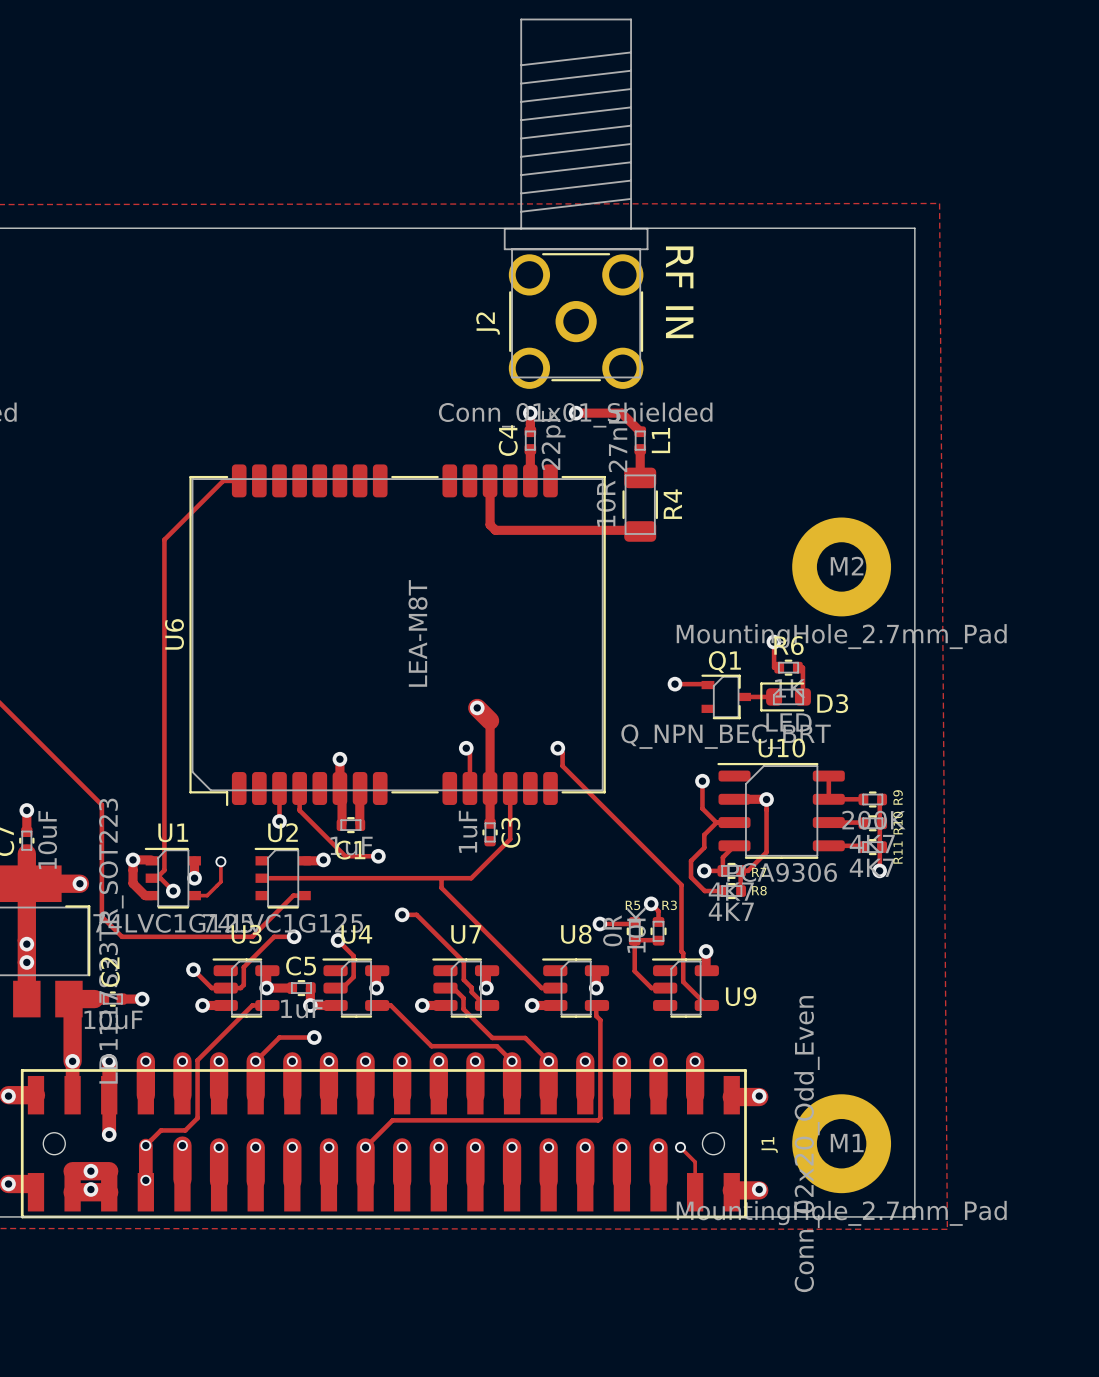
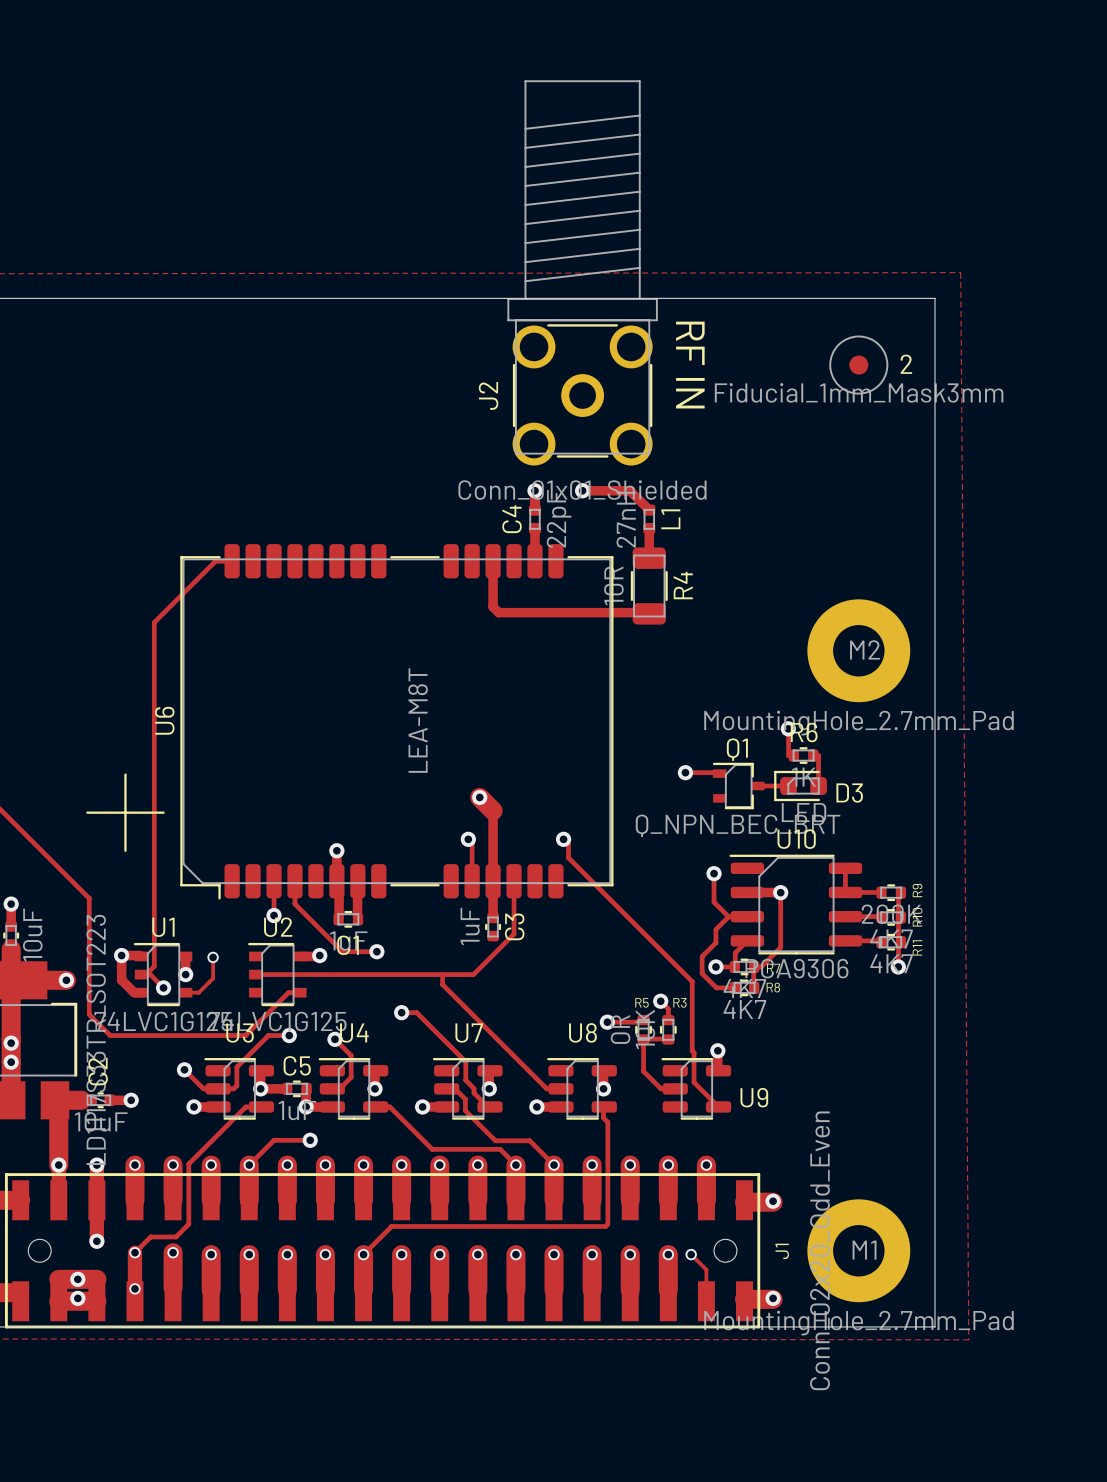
2: none -> Fiducial_1mm_Mask3mm (858, 365)
line: none -> (125, 774) (125, 850)
line: none -> (87, 812) (163, 812)

